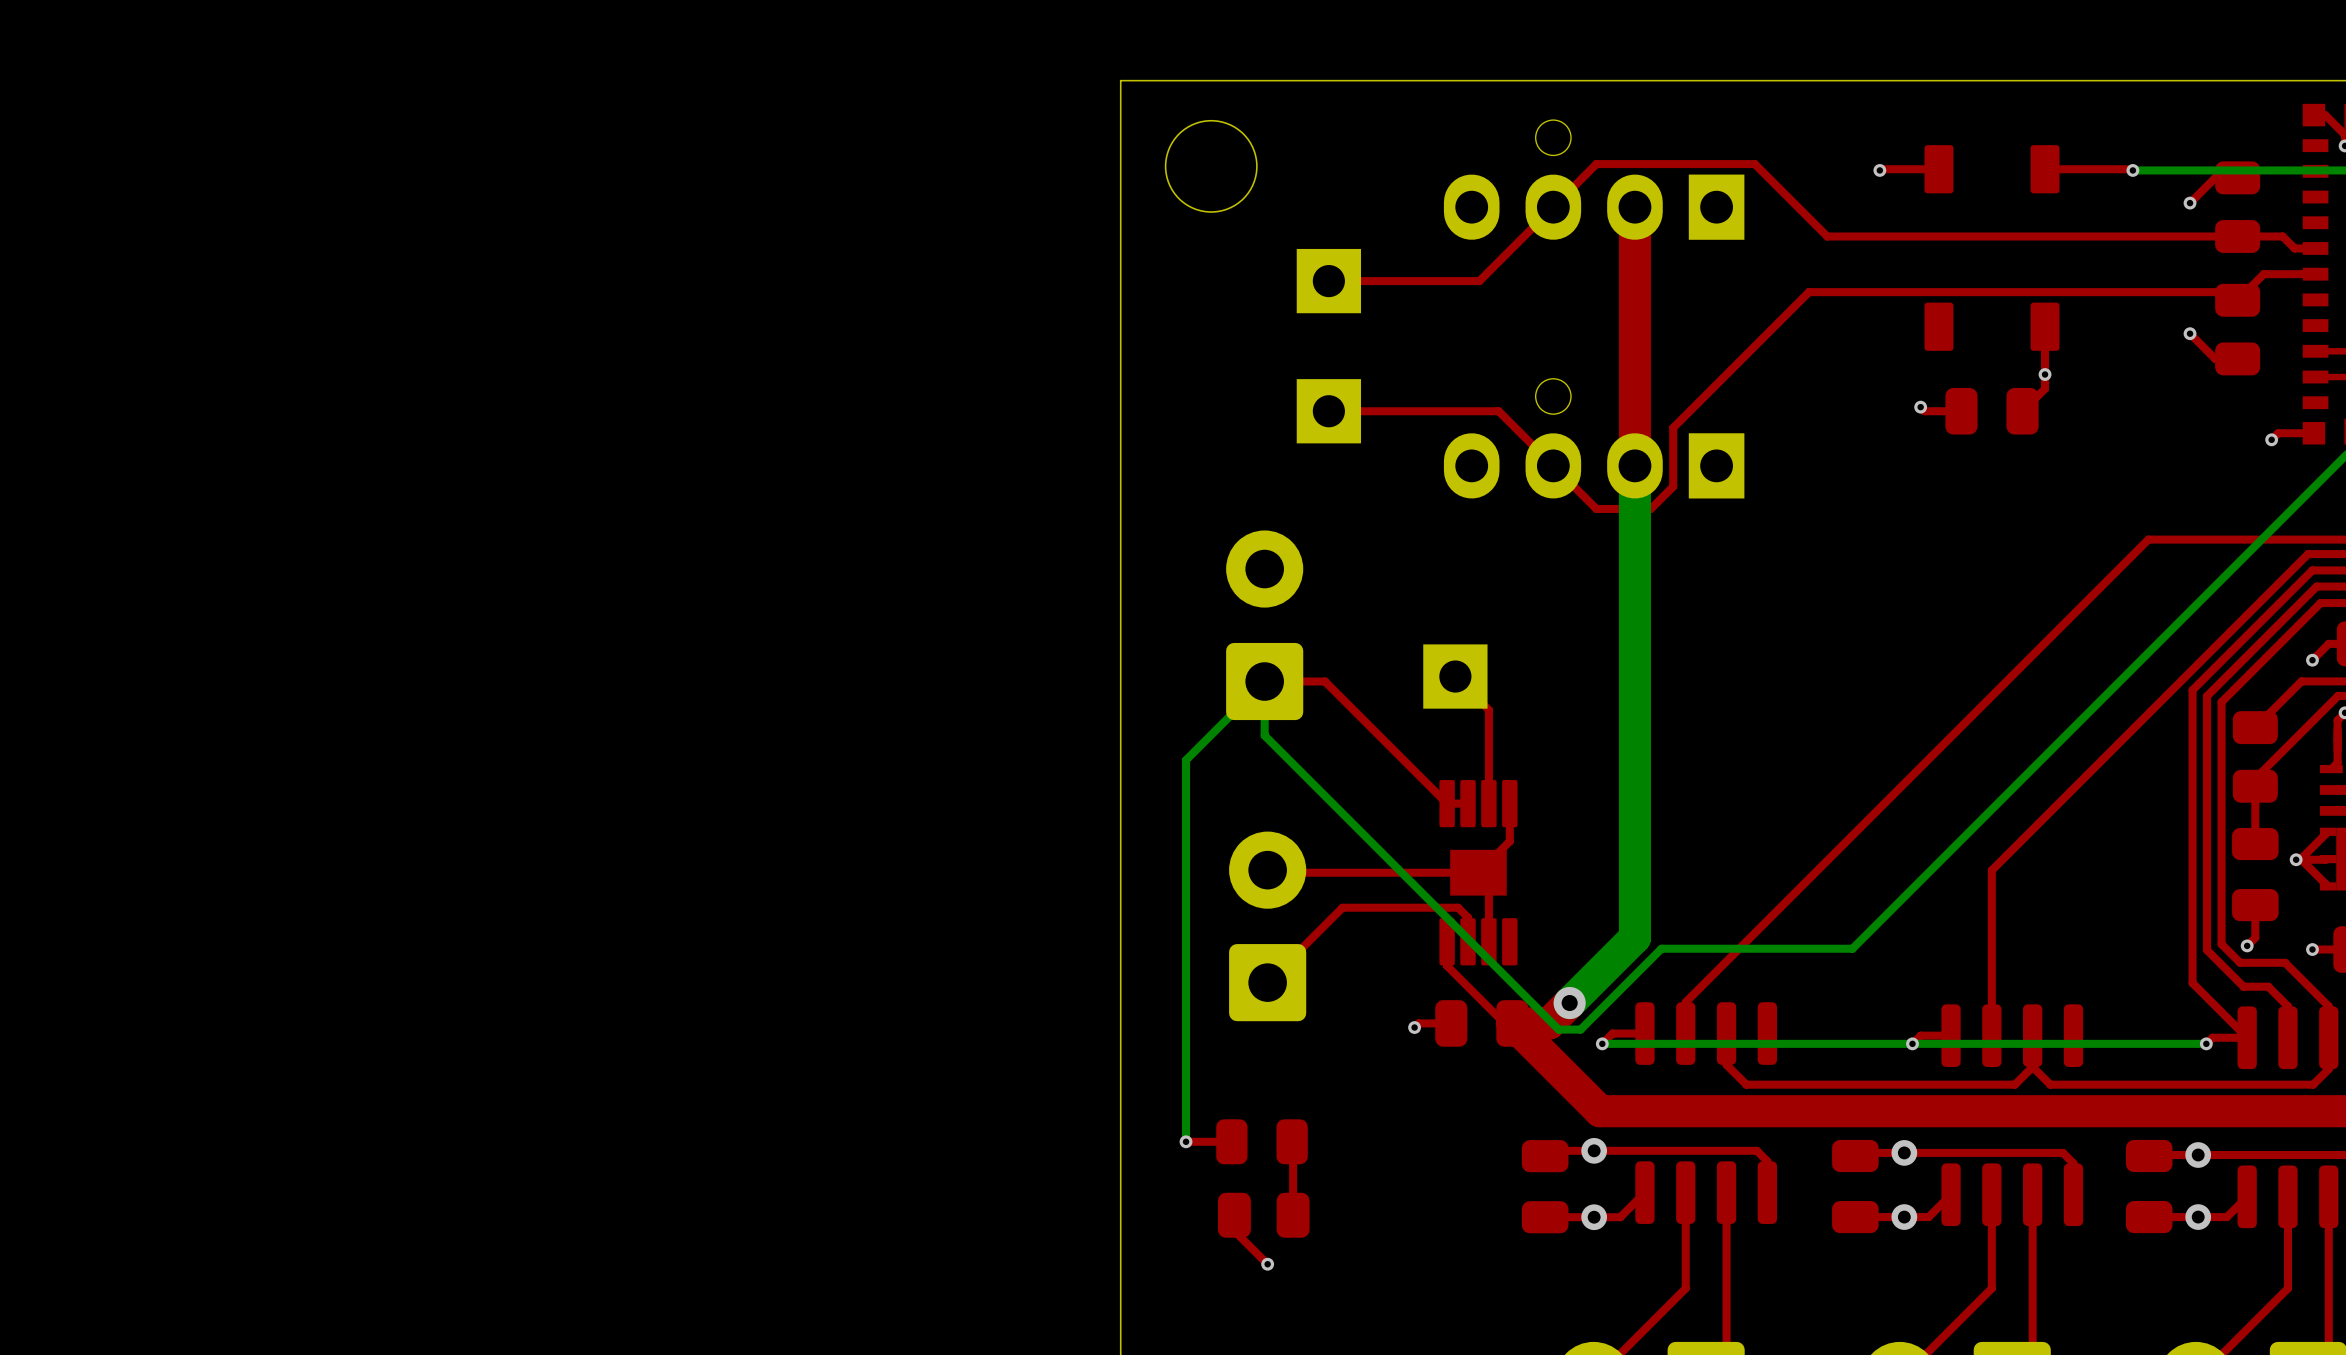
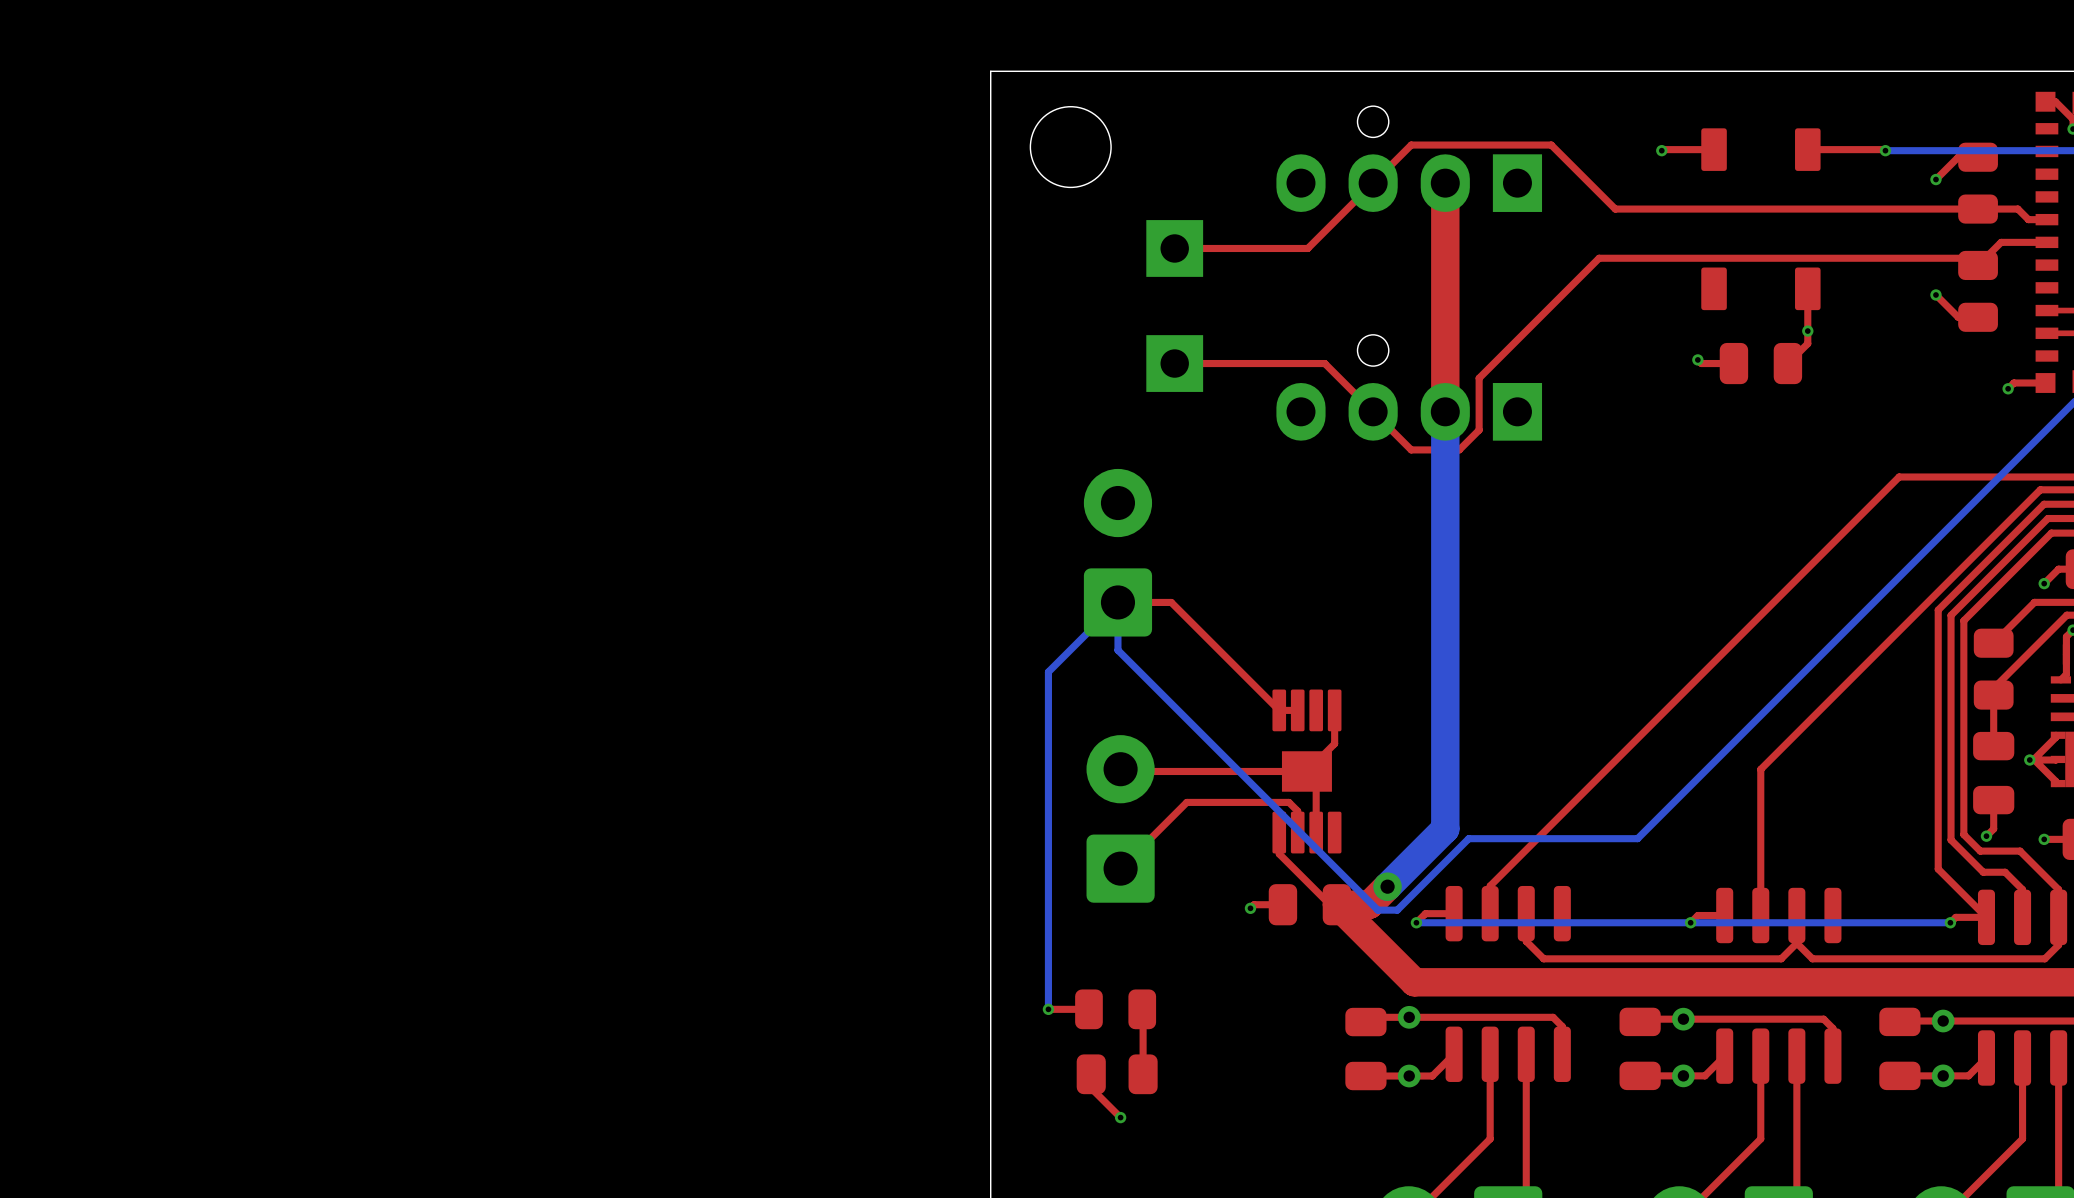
top track: (1455, 676) (1488, 710) (1488, 803) -> none
part: (1455, 676) -> none

